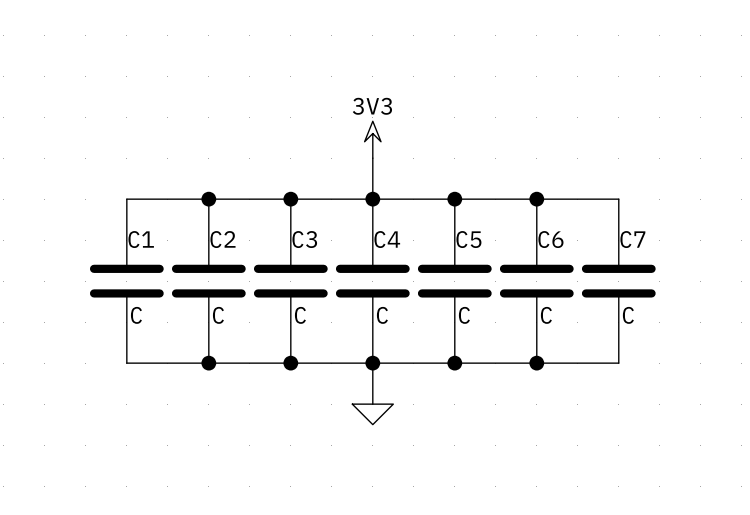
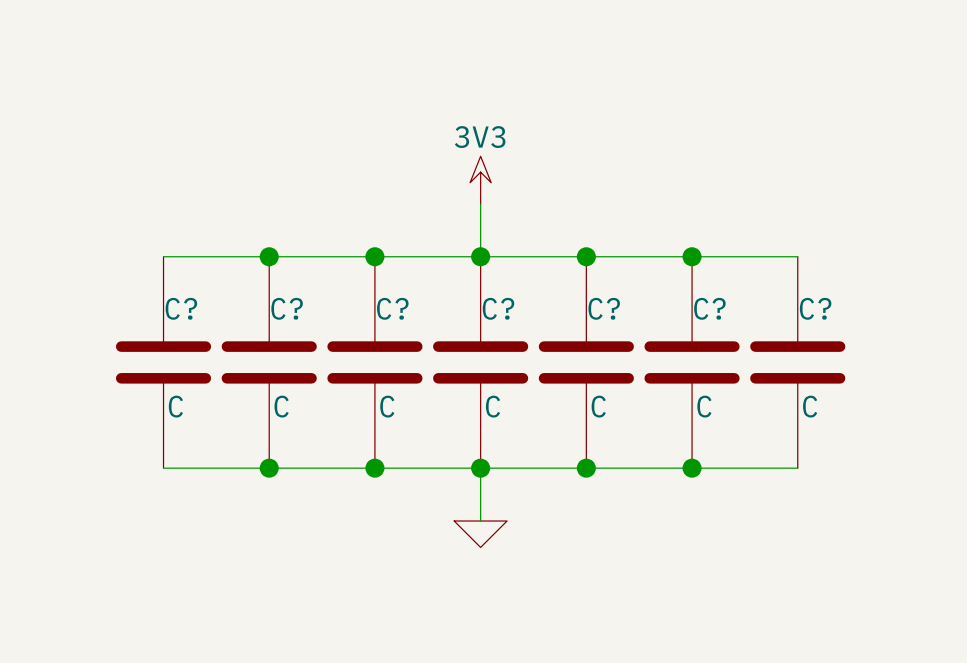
C1 name: C1 (141, 239) -> C? (181, 308)
C2 name: C2 (223, 239) -> C? (287, 308)
C3 name: C3 (304, 239) -> C? (392, 308)
C4 name: C4 (387, 239) -> C? (498, 308)
C5 name: C5 (468, 239) -> C? (604, 308)
C6 name: C6 (550, 239) -> C? (709, 308)
C7 name: C7 (632, 239) -> C? (815, 308)

